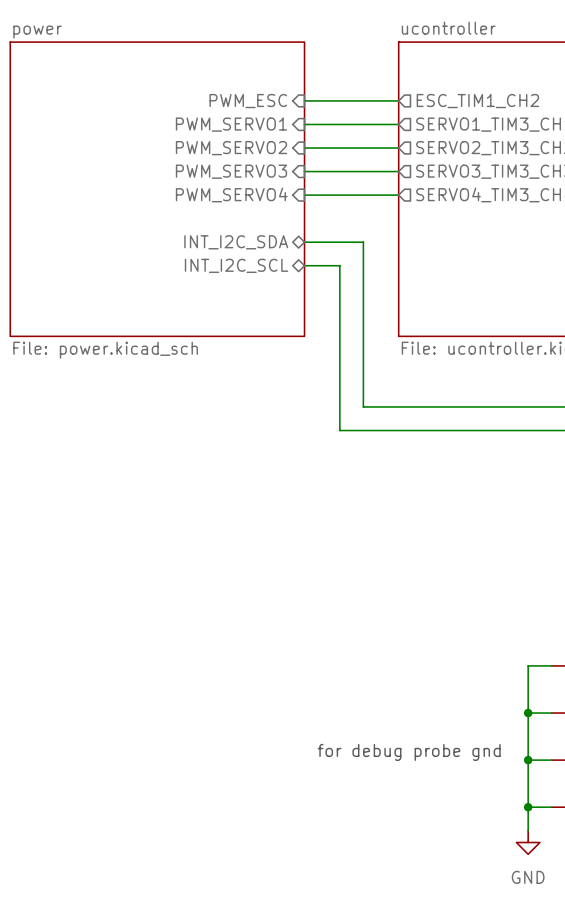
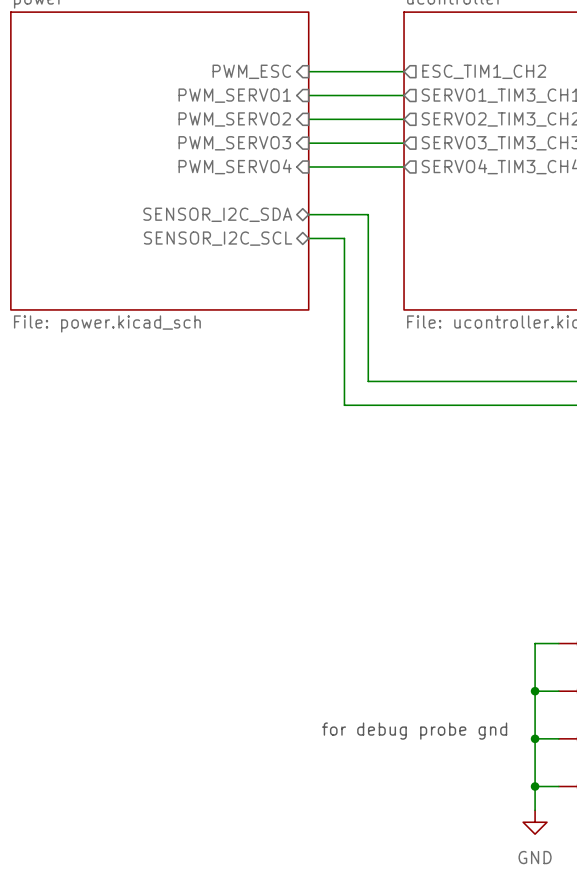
sheet pin: INT_I2C_SDA (236, 242) -> SENSOR_I2C_SDA (217, 214)
sheet pin: INT_I2C_SCL (236, 265) -> SENSOR_I2C_SCL (218, 238)

